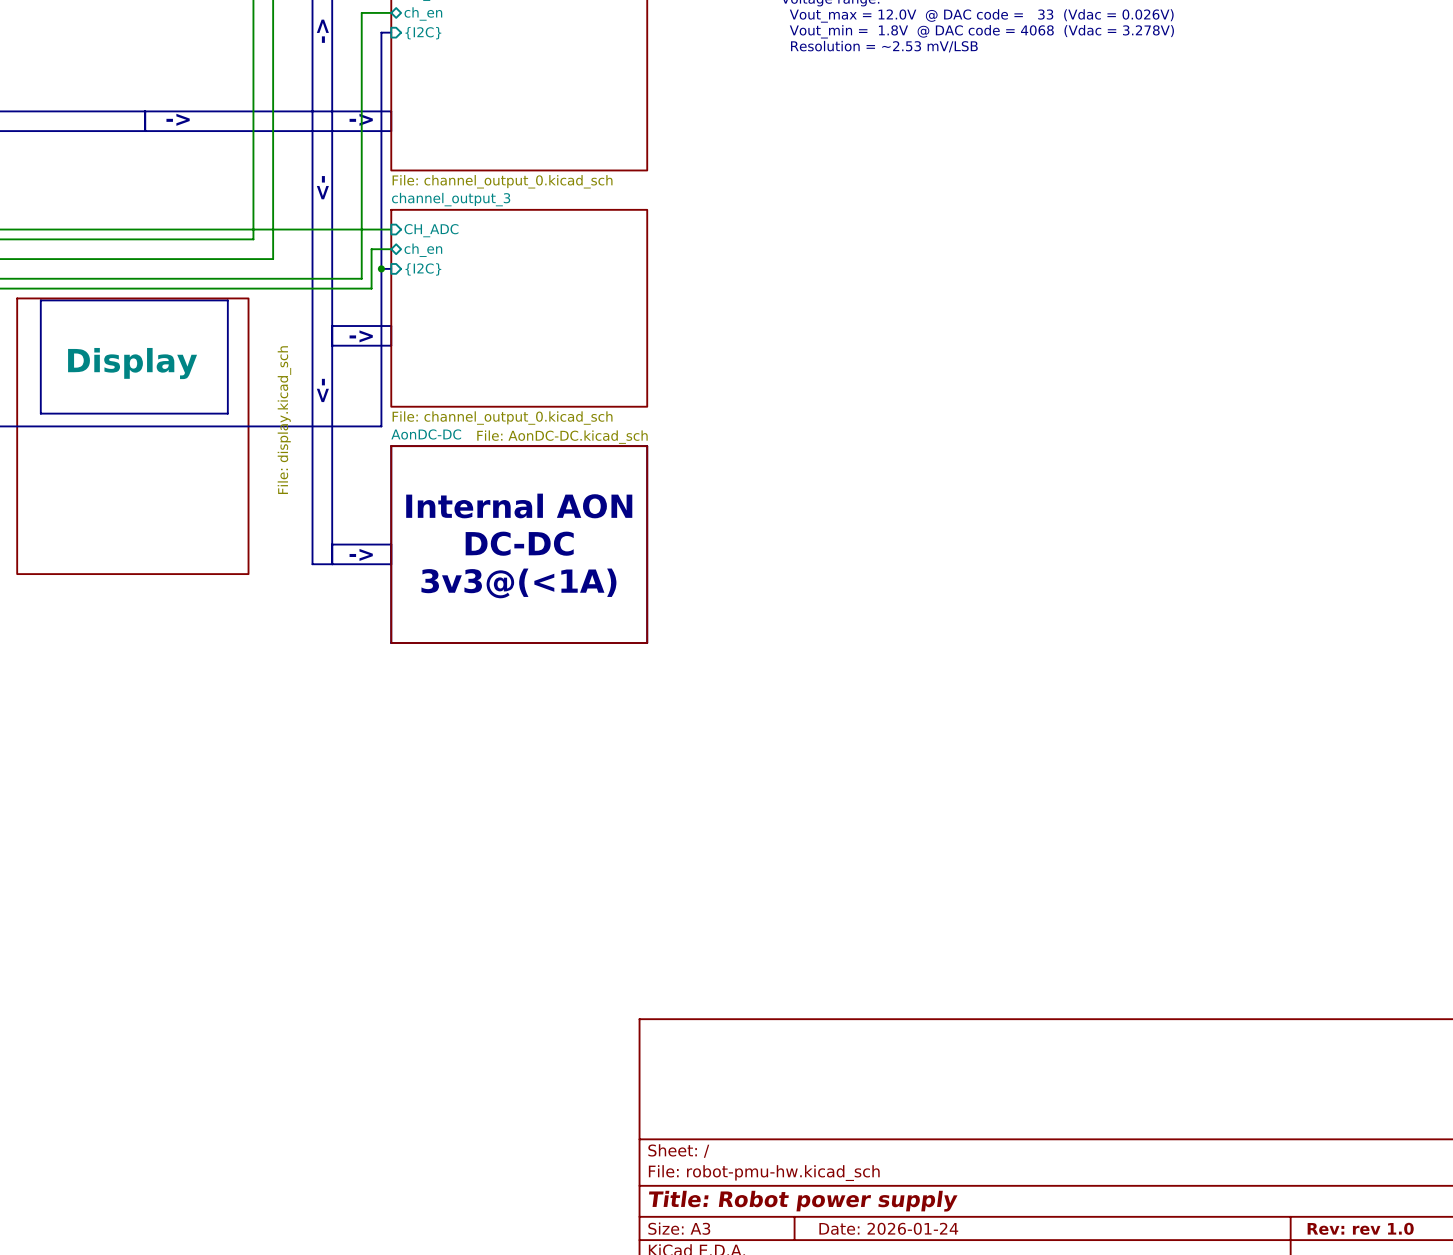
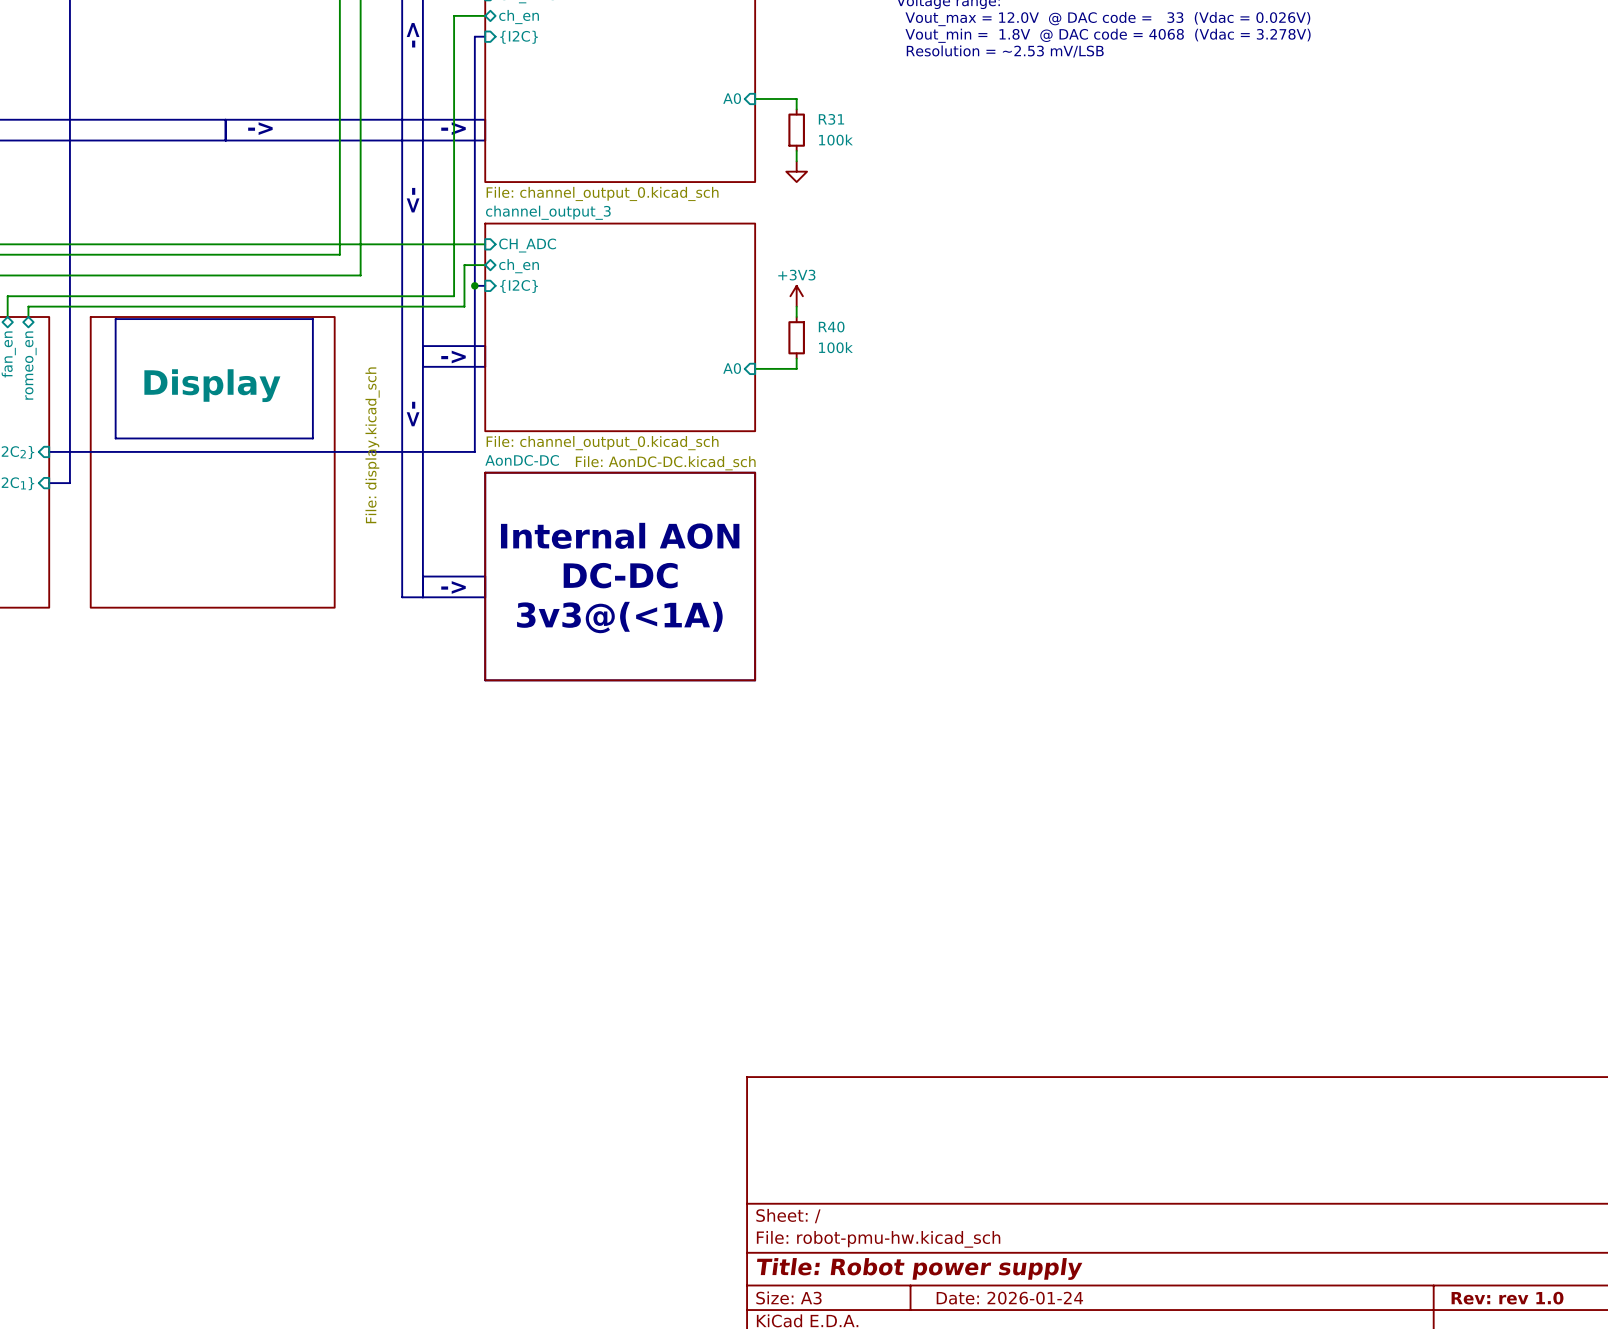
sheet pin: none -> A0 (732, 98)
wire: none -> (755, 98) (796, 98) (796, 109)
R31: none -> (796, 130)
wire: none -> (796, 150) (796, 161)
power symbol: none -> (796, 171)
power symbol: none -> +3V3 (796, 296)
wire: none -> (796, 306) (796, 317)
R40: none -> (796, 337)
wire: none -> (796, 358) (796, 368) (755, 368)
sheet pin: none -> A0 (732, 368)

